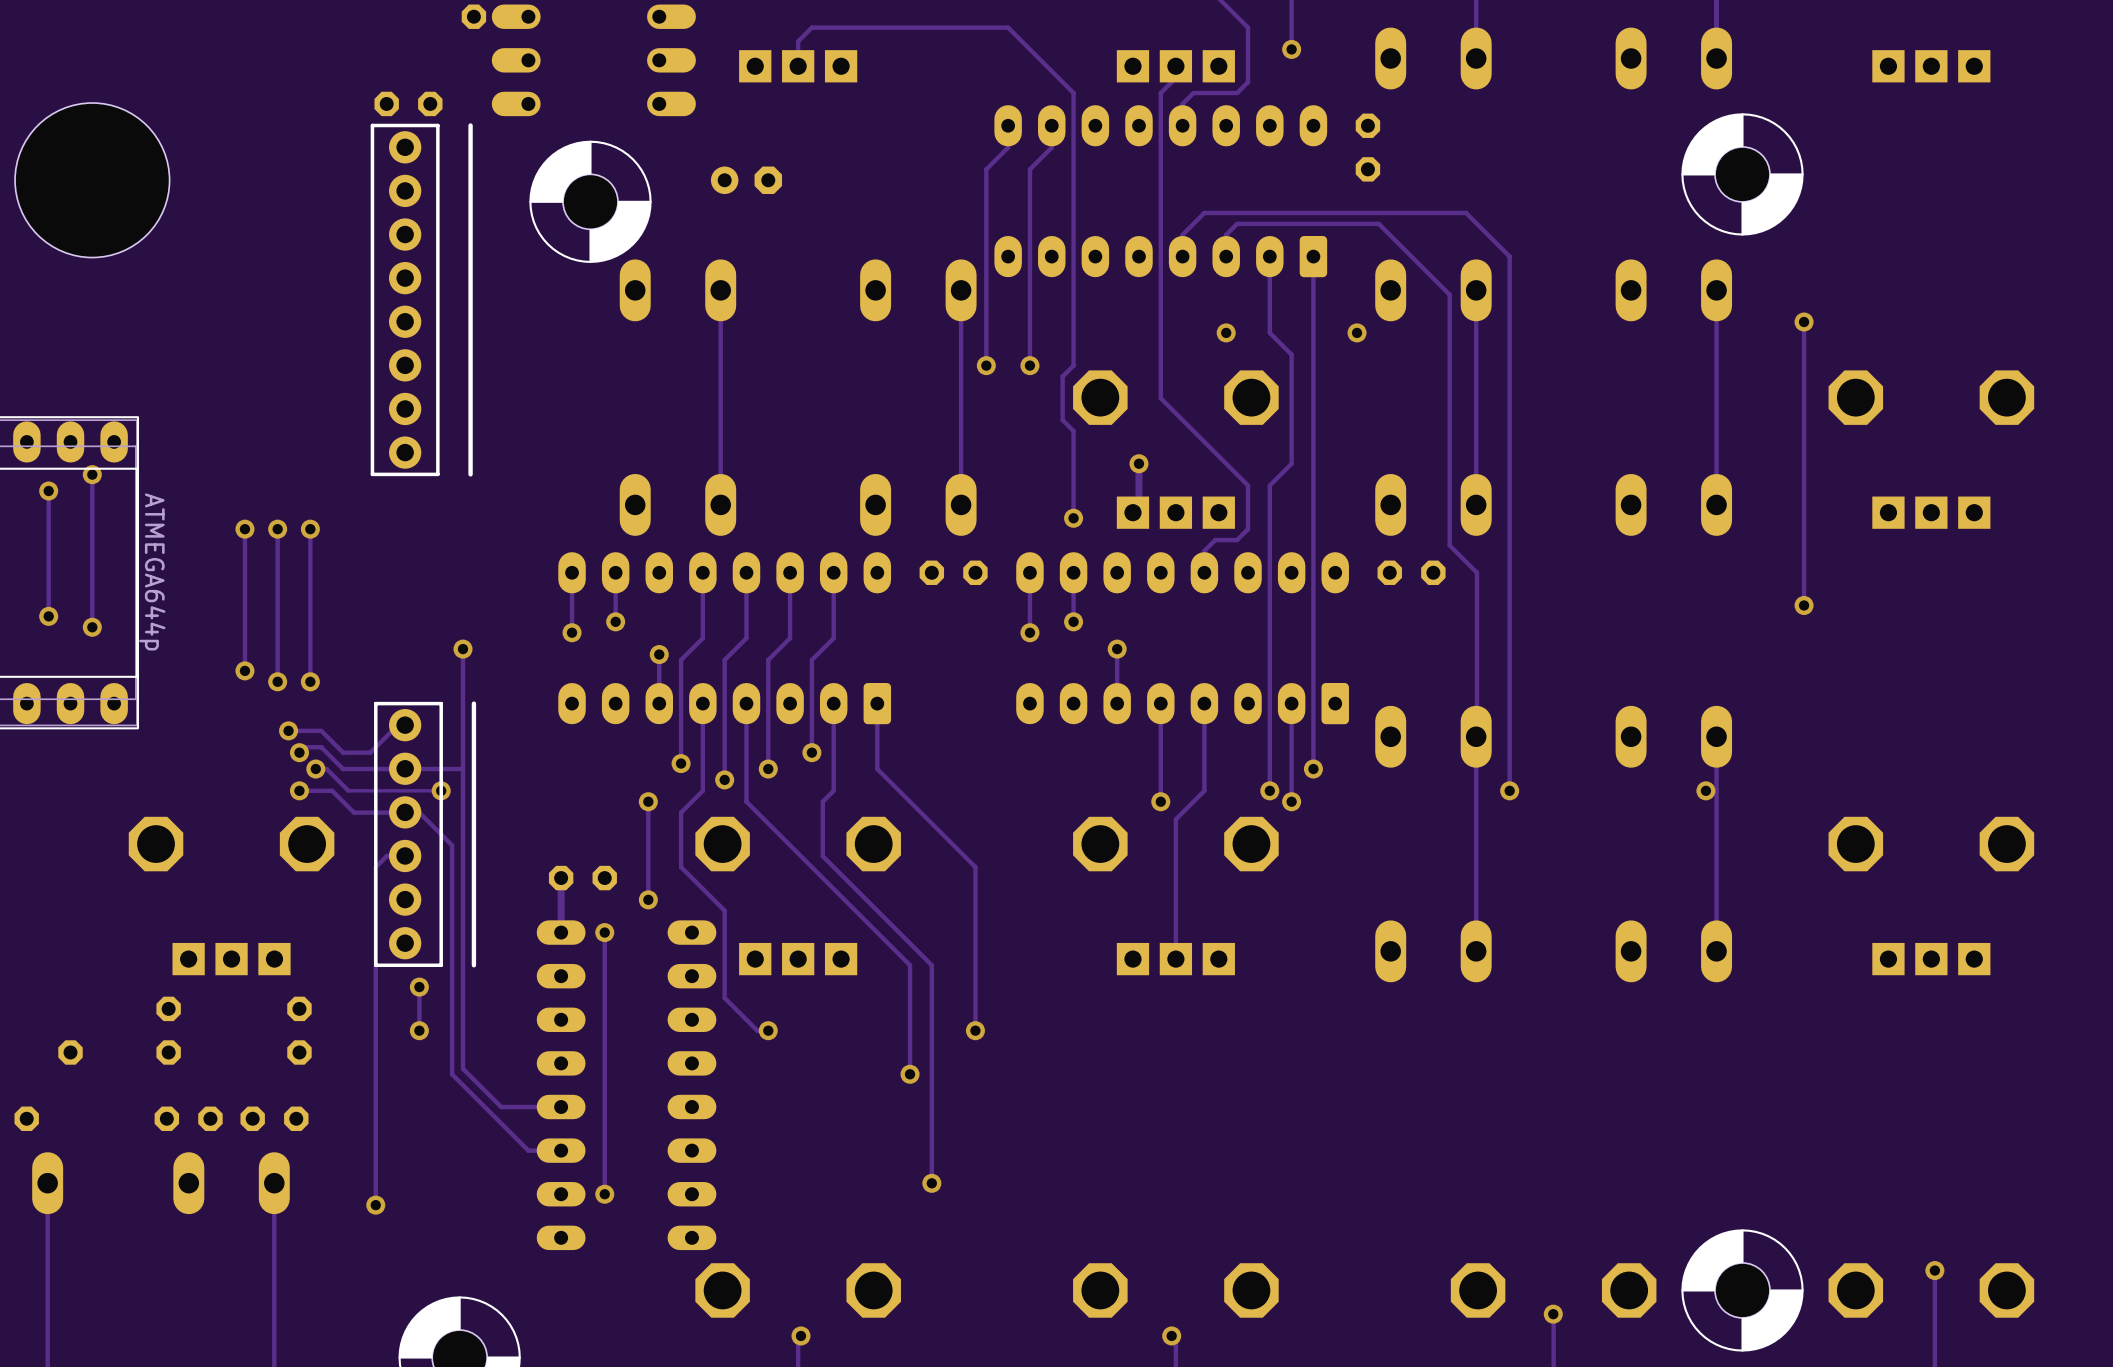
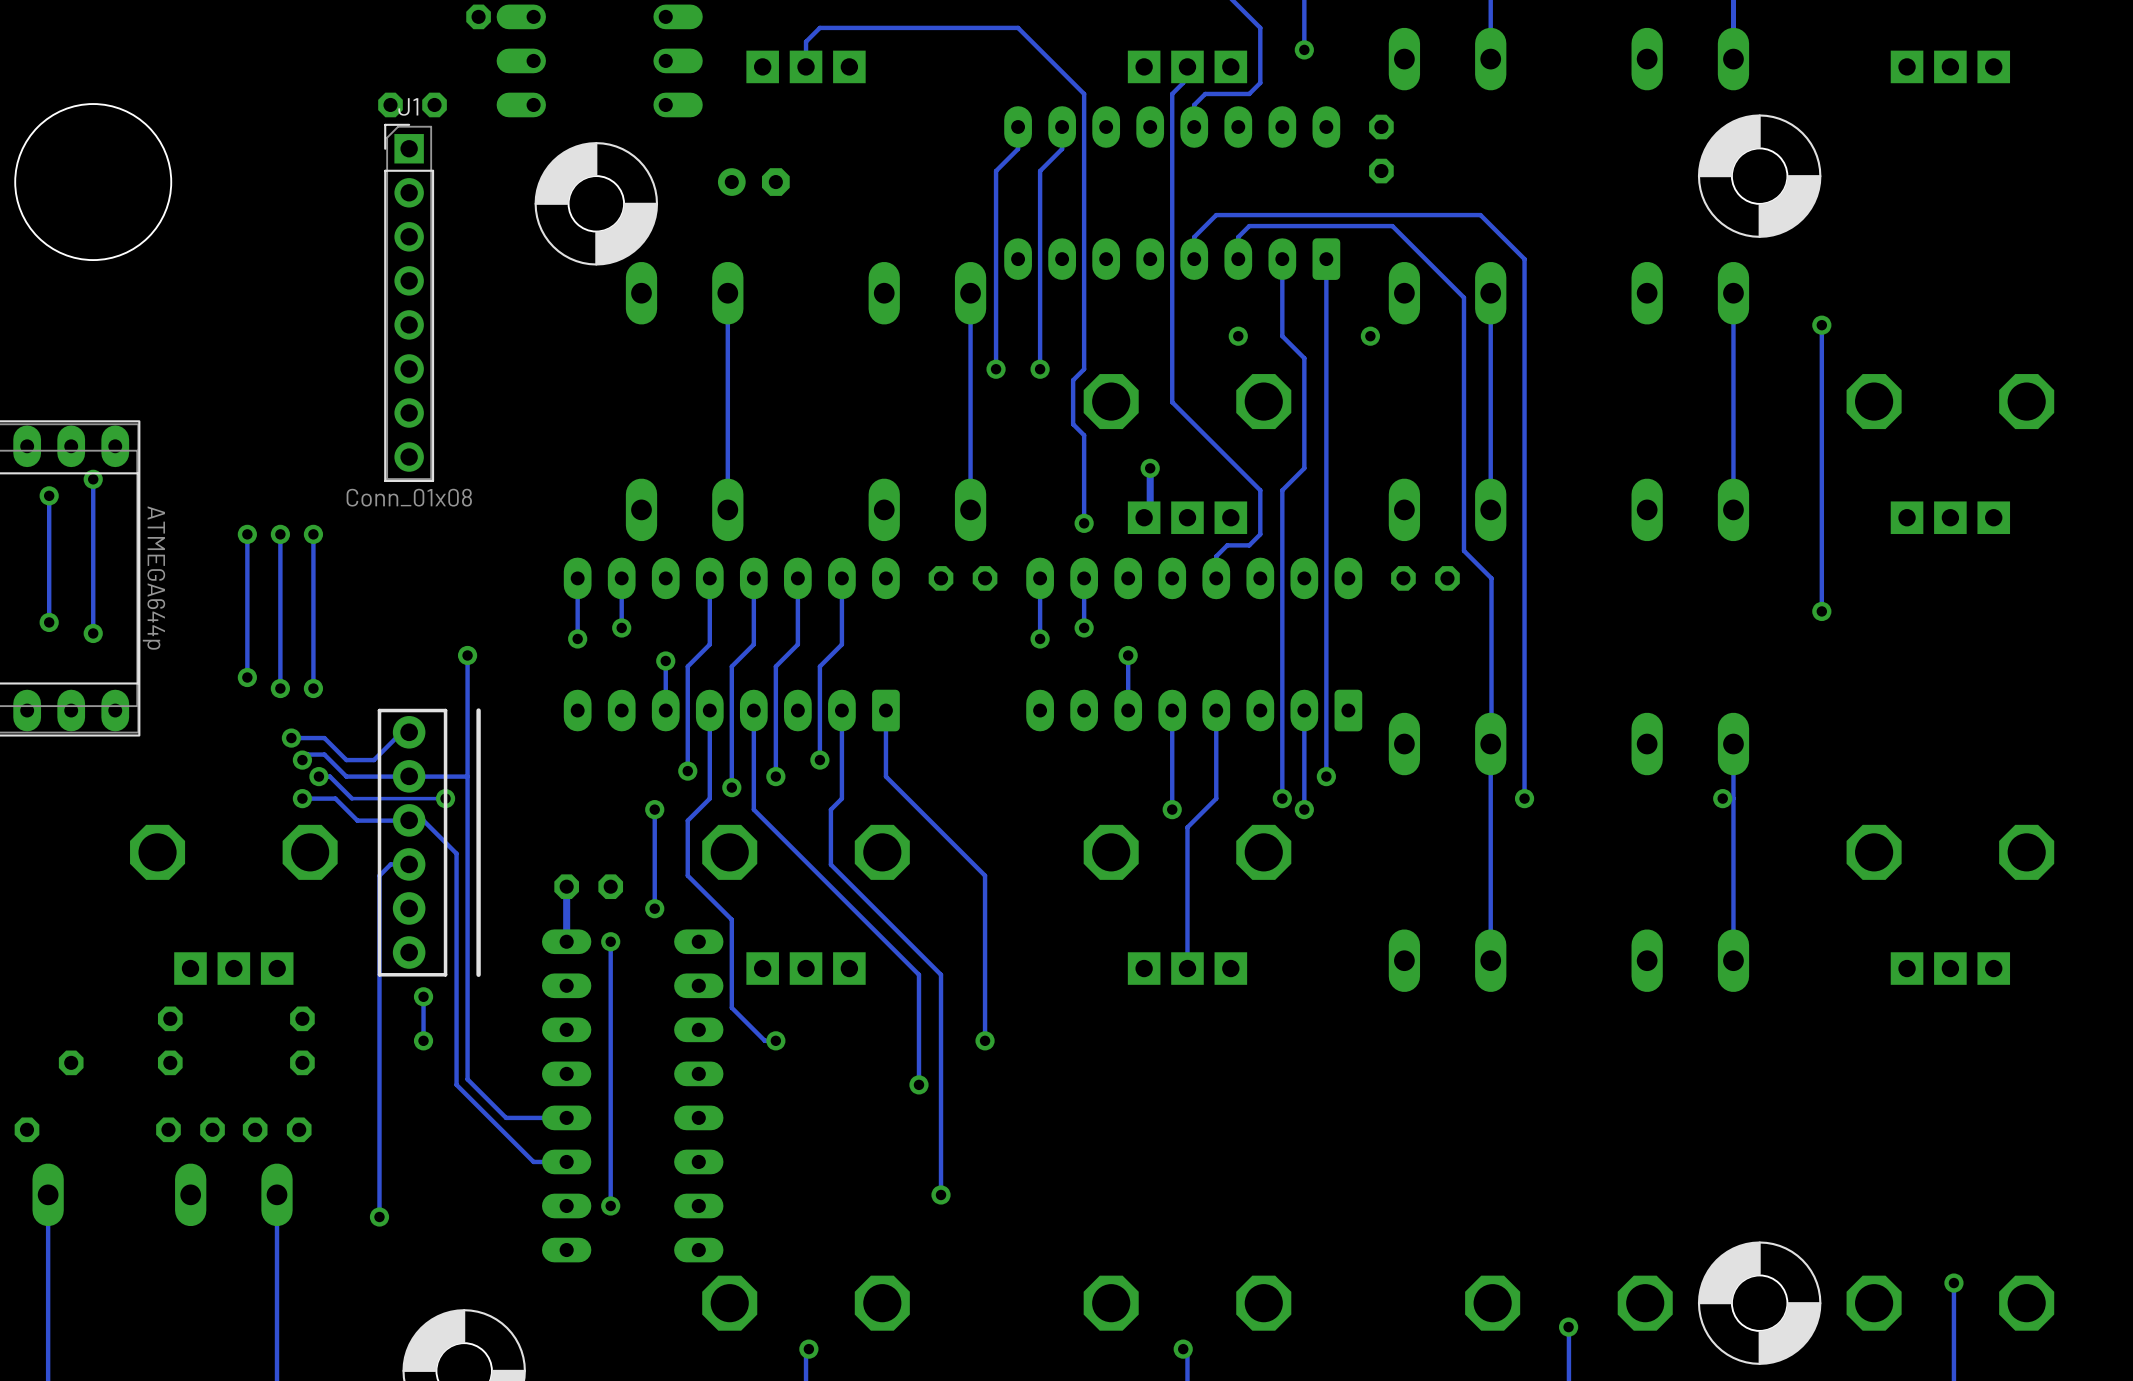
line: (437, 125) (372, 125) (372, 474) (437, 474) (437, 125) -> none
line: (470, 125) (470, 474) -> none
part: (405, 256) -> none
J1: none -> Conn_01x08 (409, 302)
part: (405, 430) -> none

